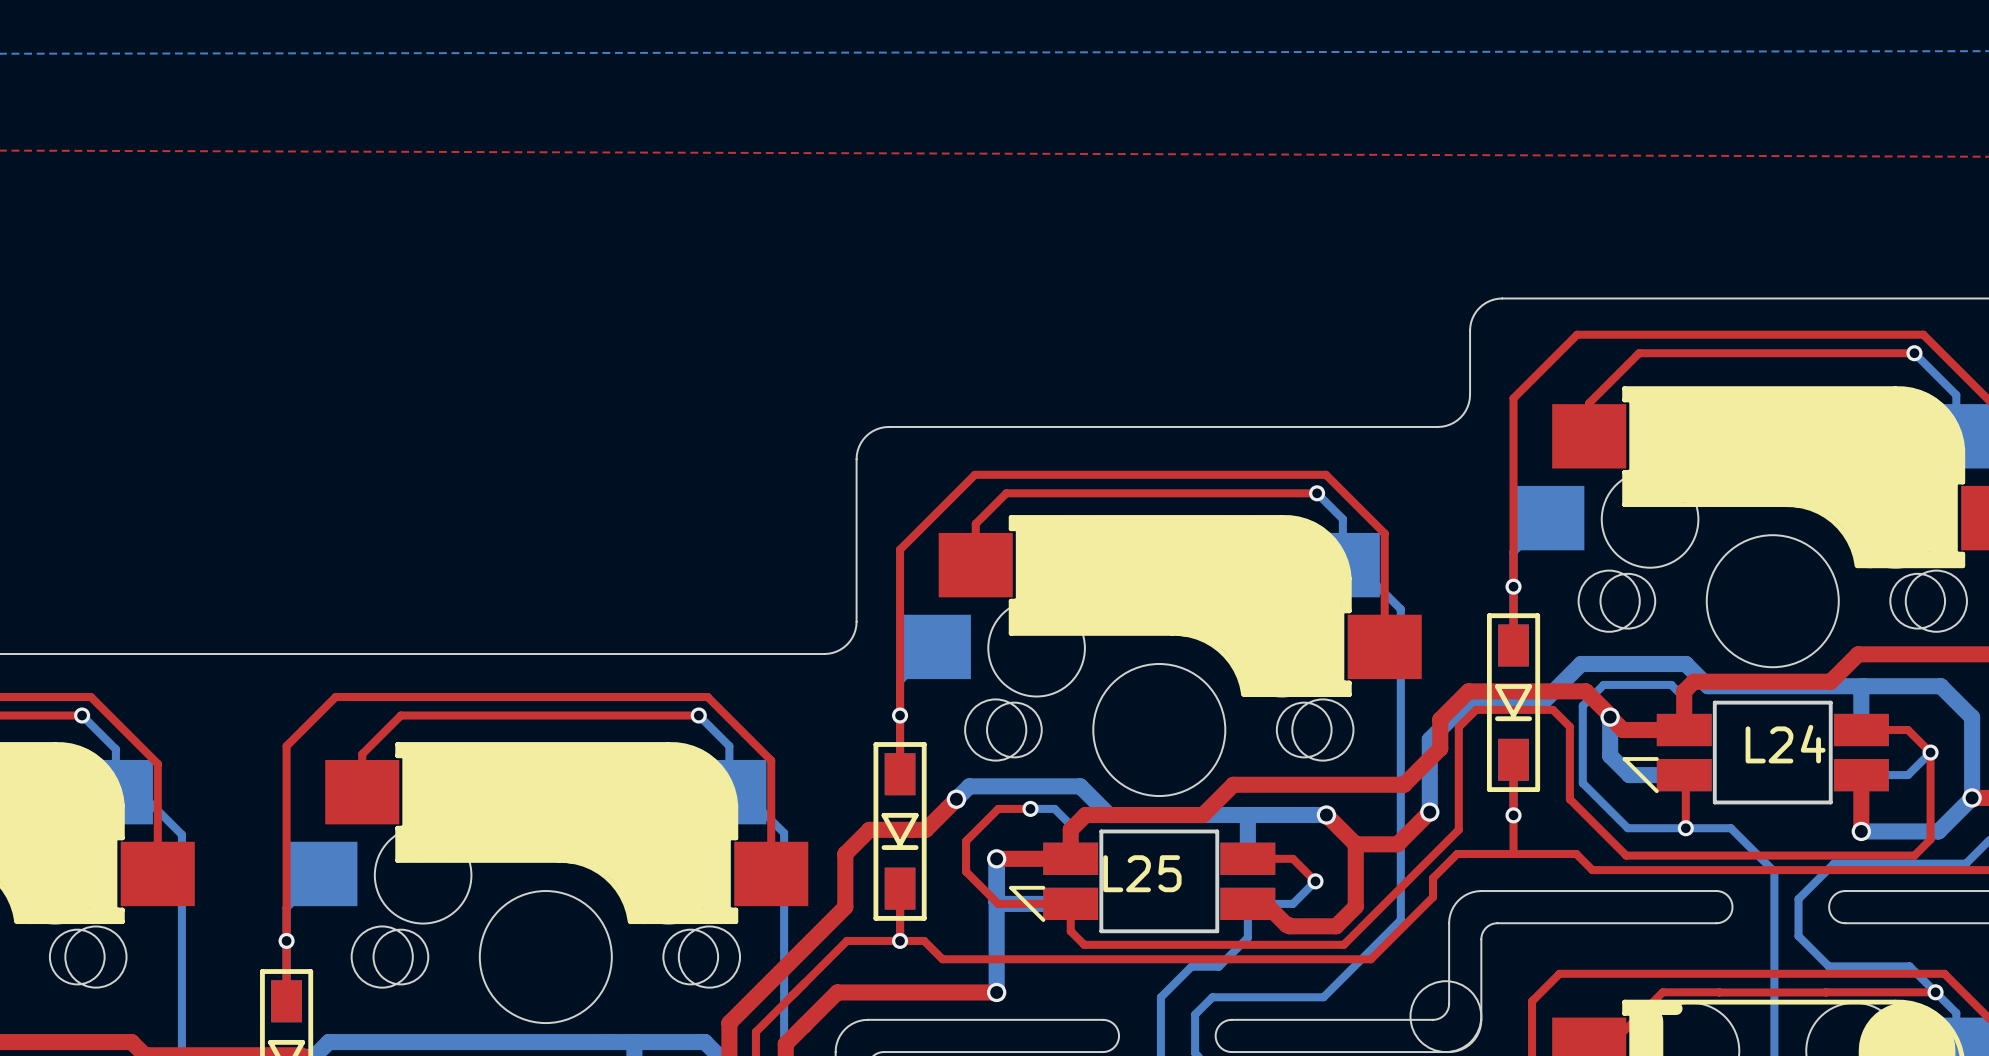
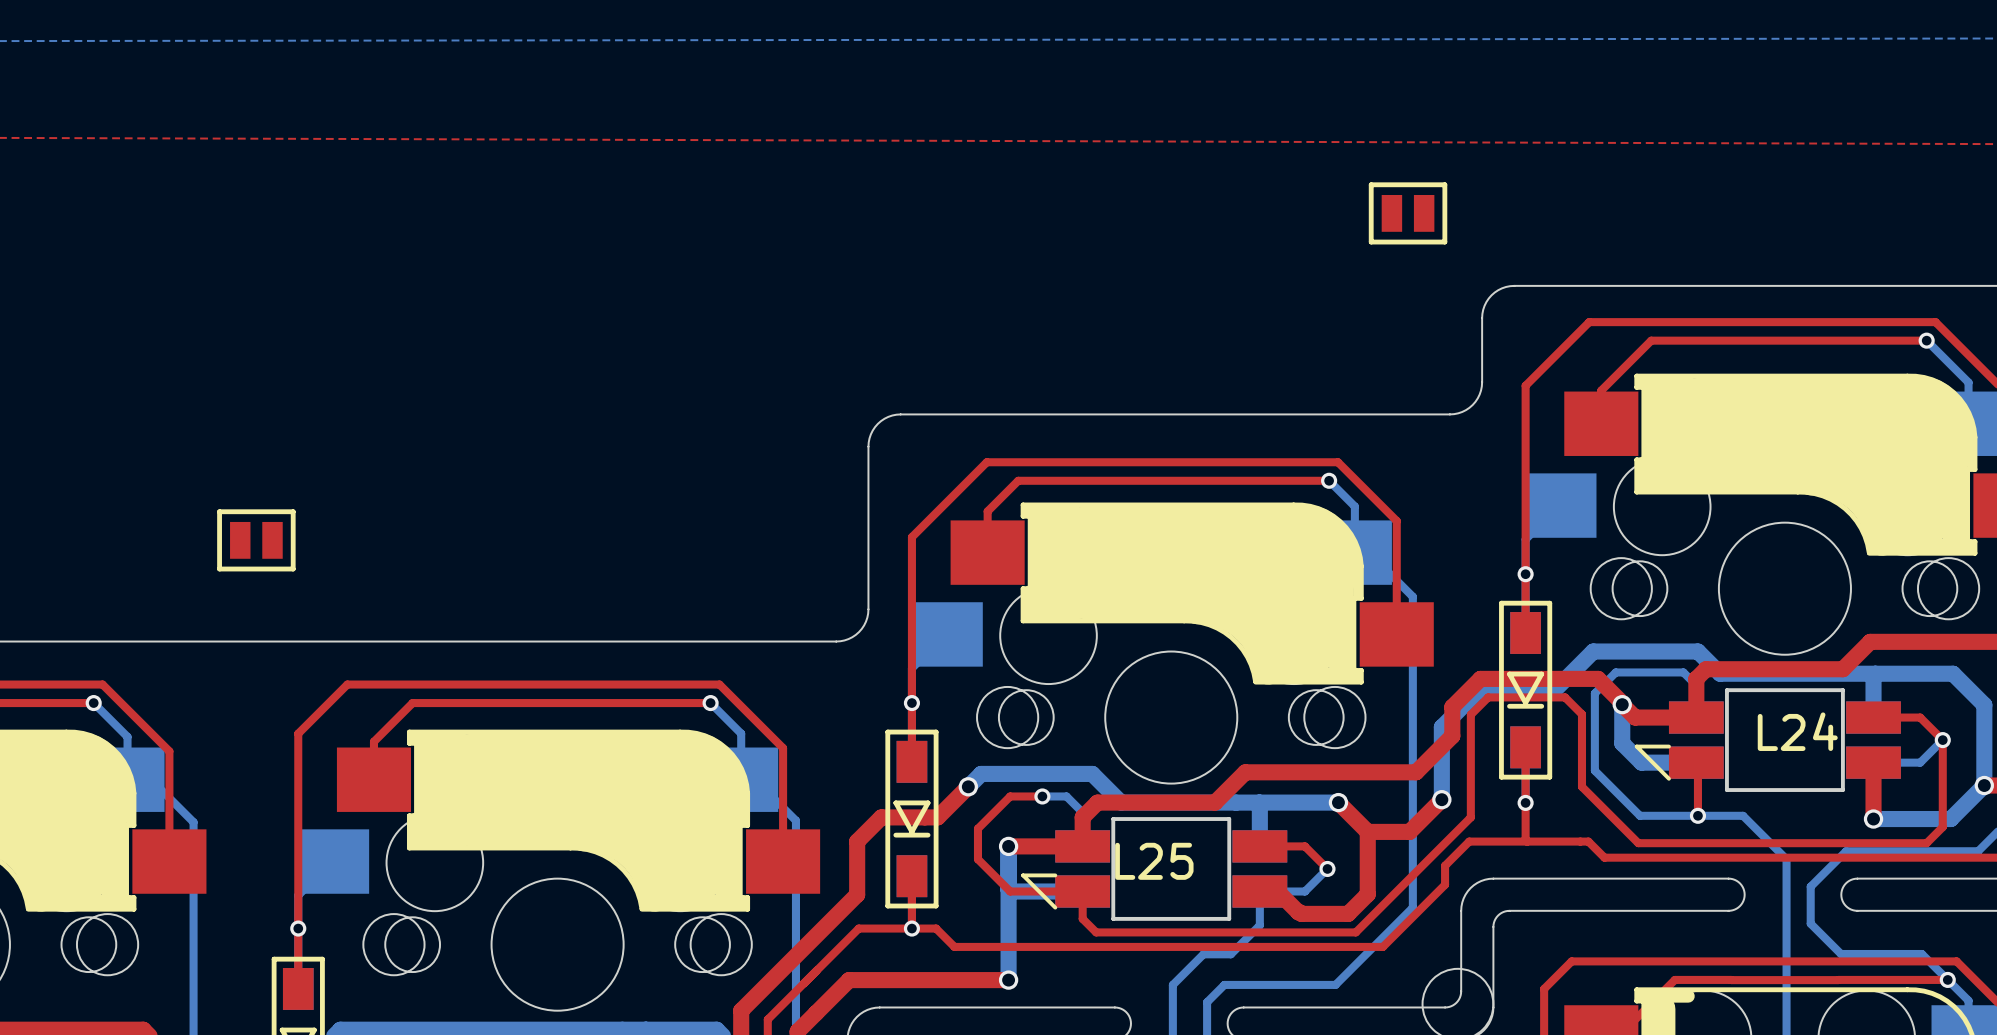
part: none -> (1408, 213)
part: none -> (256, 540)

